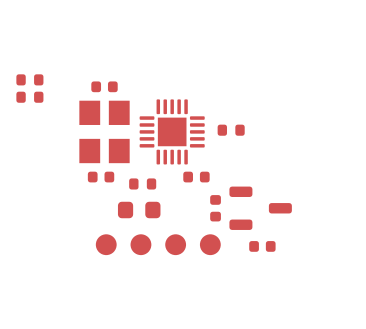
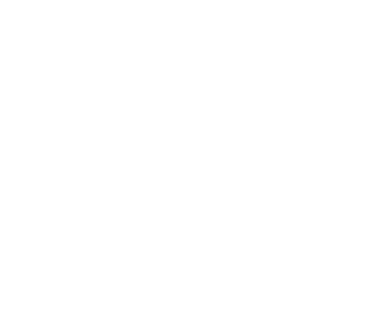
part: (29, 79) -> none
part: (104, 86) -> none
part: (29, 97) -> none
part: (231, 130) -> none
part: (104, 131) -> none
part: (172, 131) -> none
part: (101, 177) -> none
part: (196, 177) -> none
part: (142, 183) -> none
part: (215, 208) -> none
part: (260, 208) -> none
part: (139, 210) -> none
part: (158, 244) -> none
part: (262, 246) -> none

